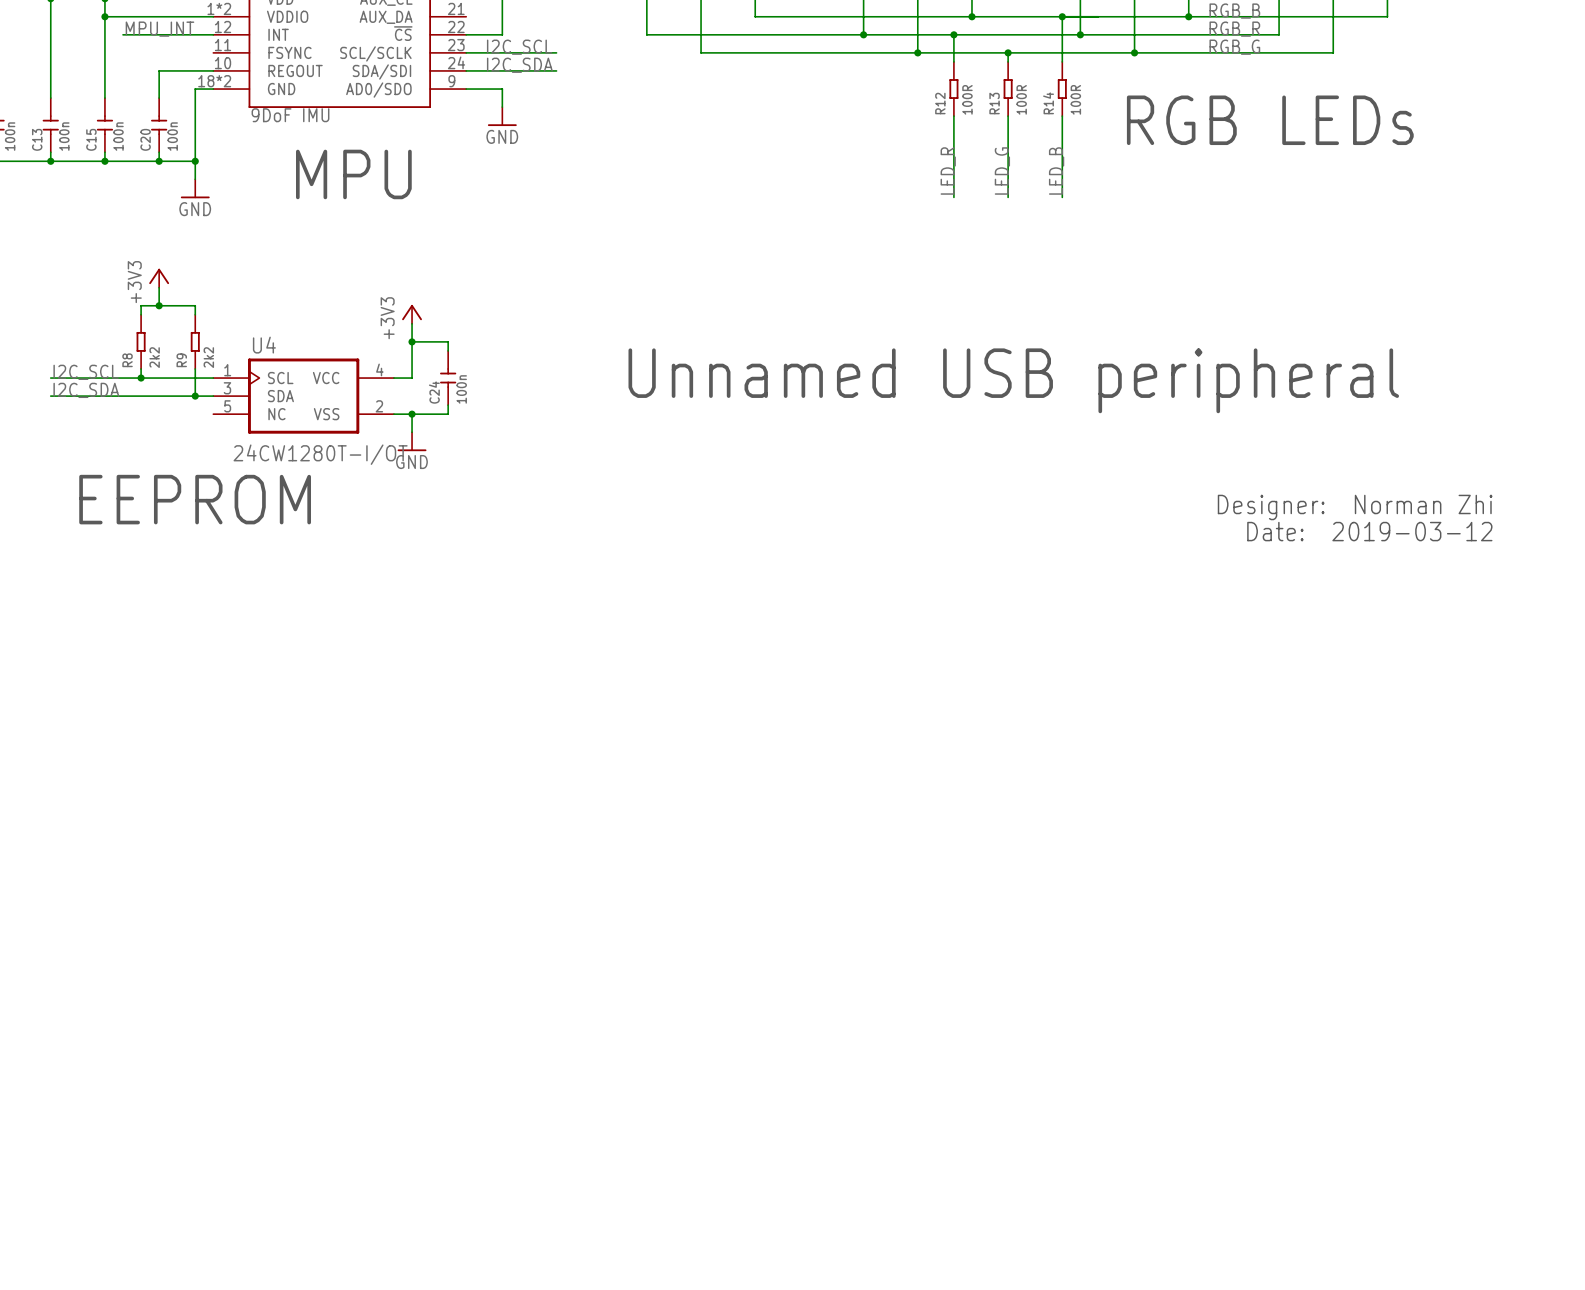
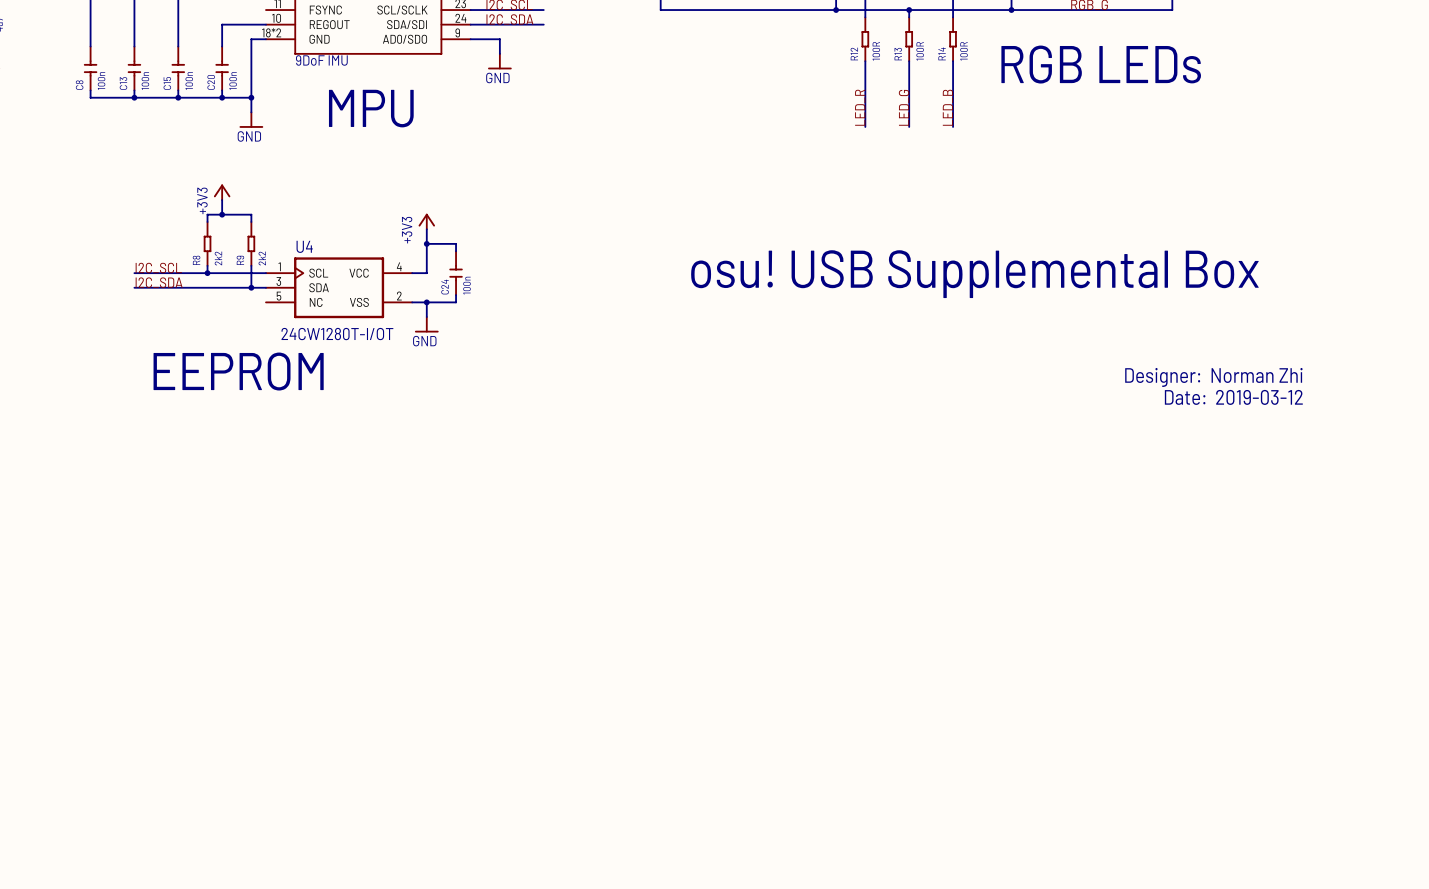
text: none -> osu! USB Supplemental Box (974, 274)
text: Unnamed USB peripheral (1013, 380) -> none

